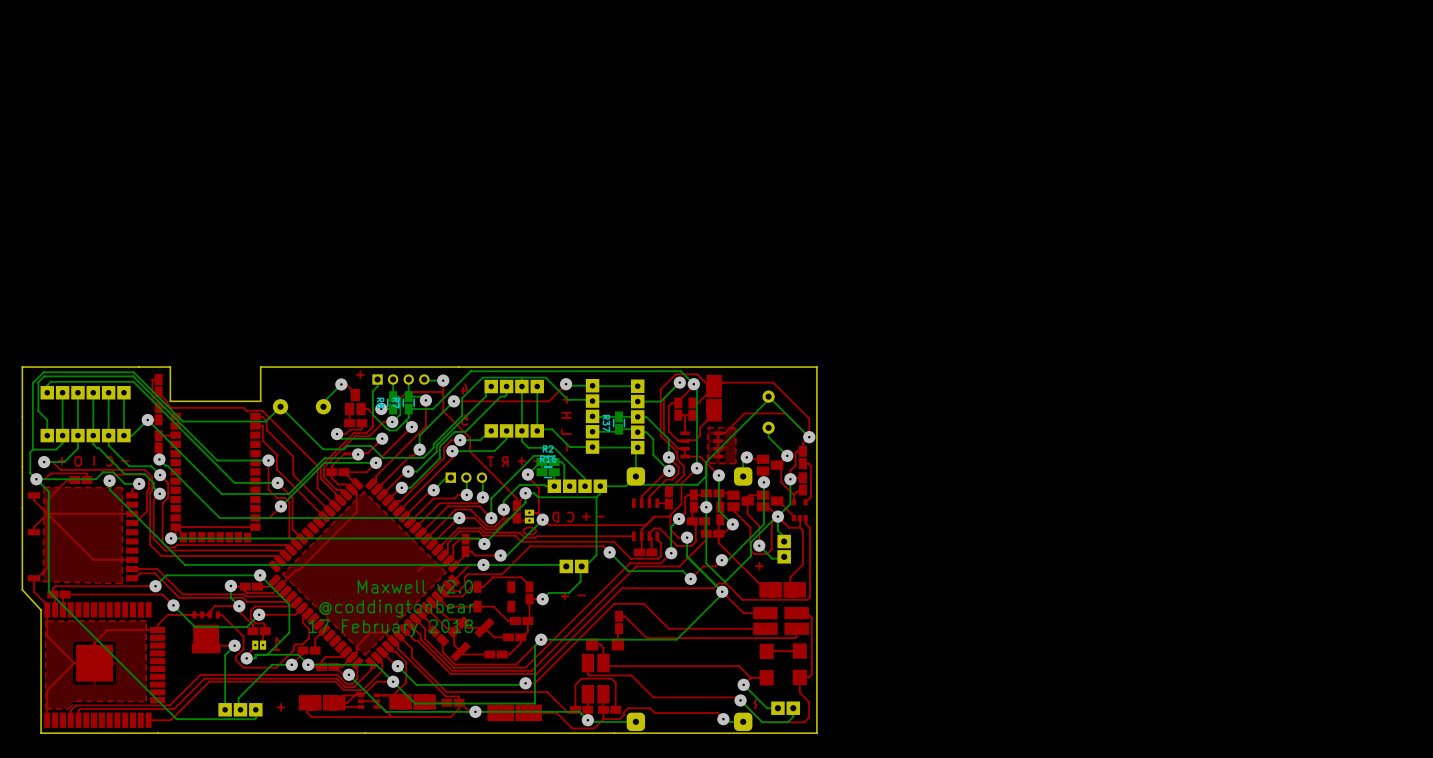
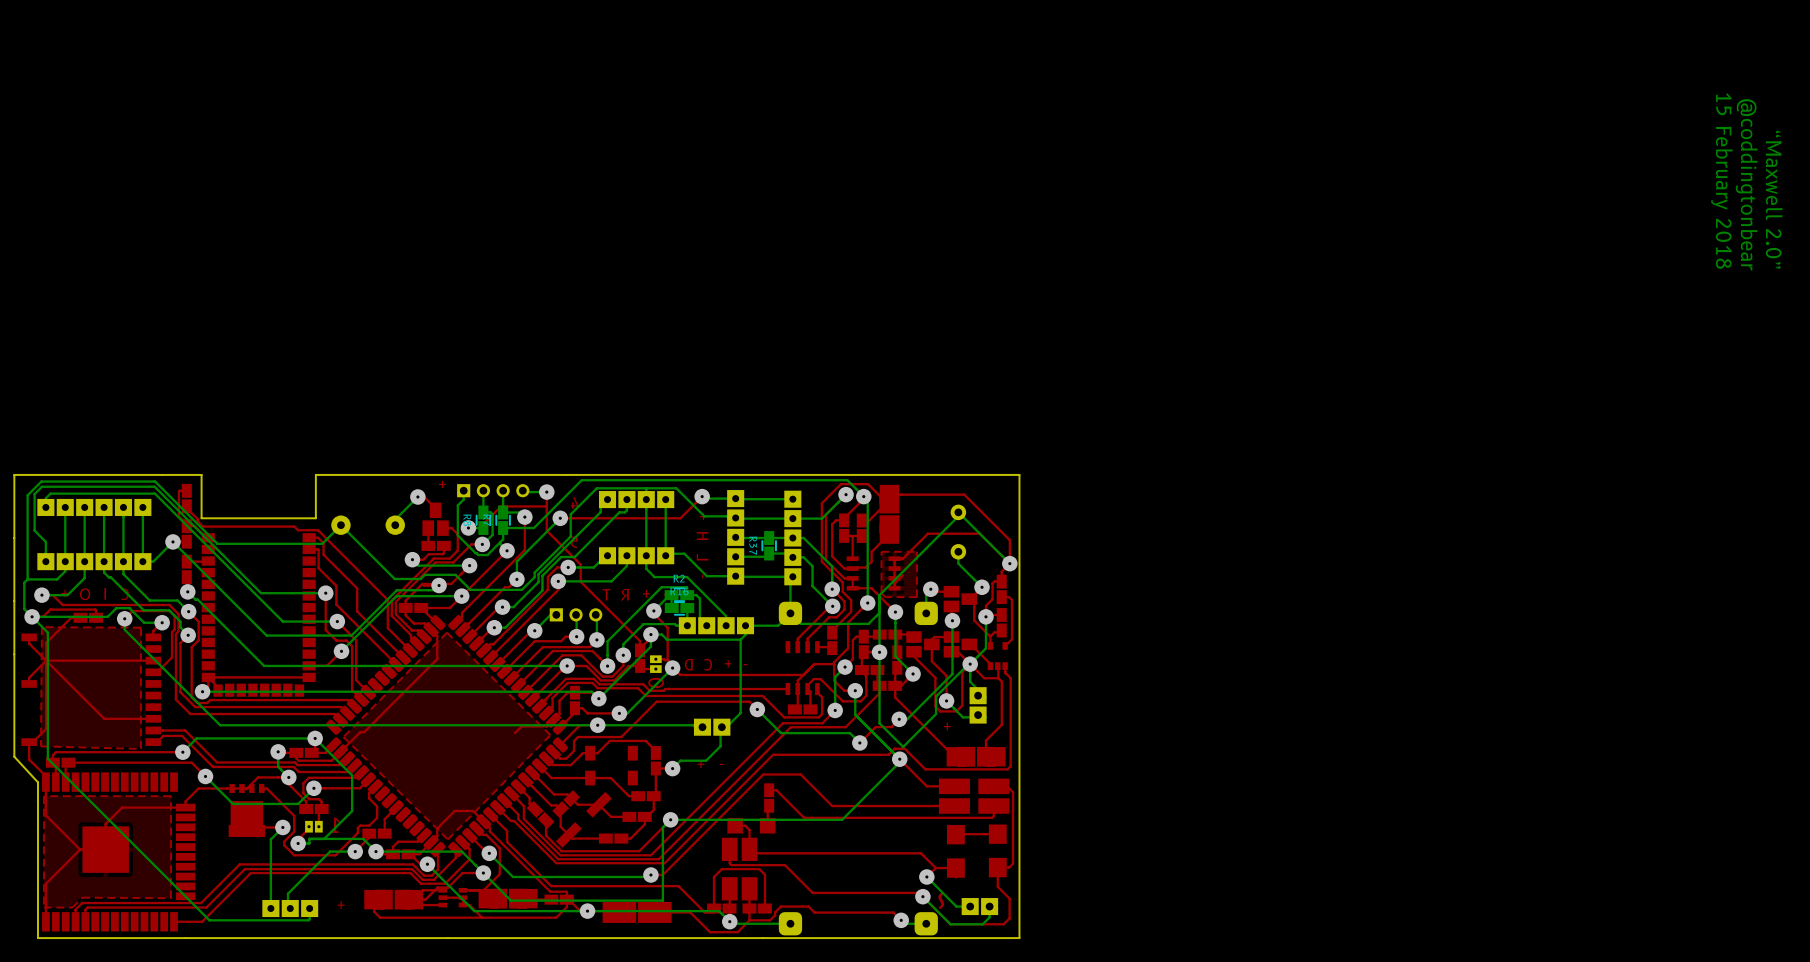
text: none -> 15 February 2018 (1721, 181)
text: none -> @coddingtonbear (1746, 184)
text: none -> “Maxwell 2.0” (1774, 199)
text: Maxwell v2.0 (415, 586) -> none
text: @coddingtonbear (396, 608) -> none
text: 17 February 2018 (390, 628) -> none

